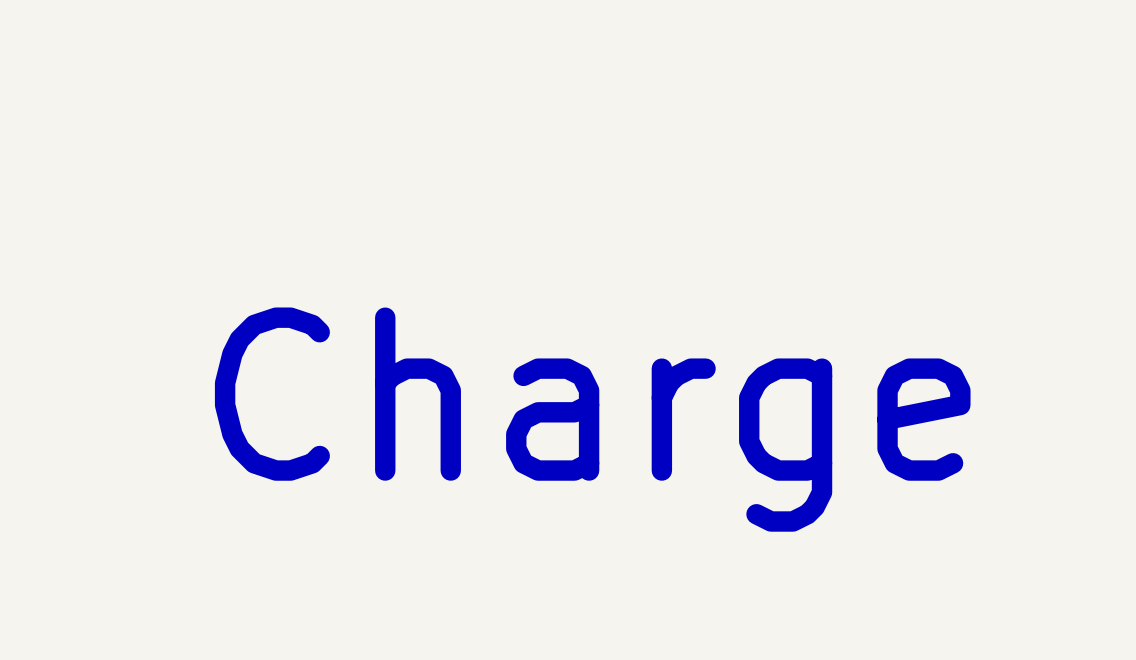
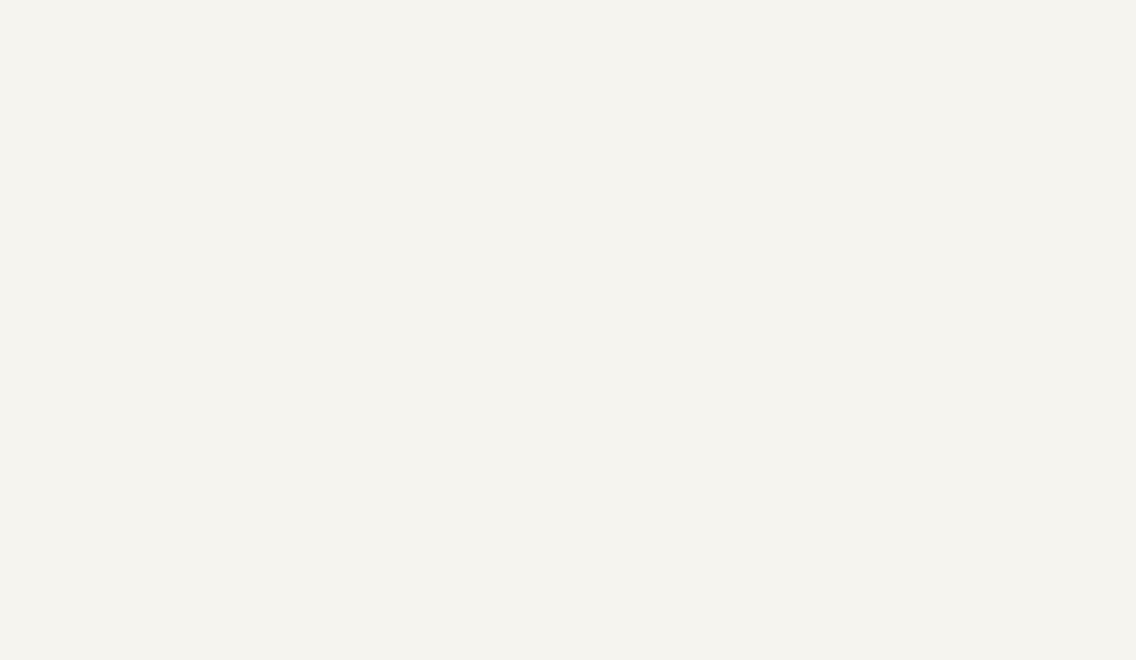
text: Charge (592, 419) -> none

